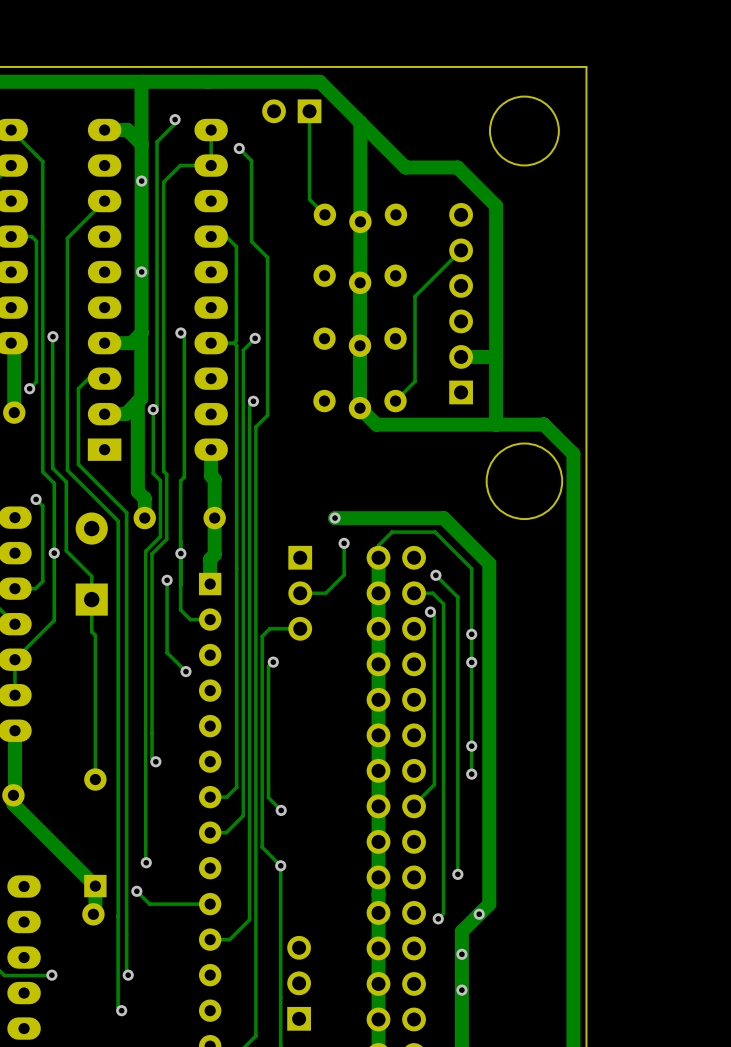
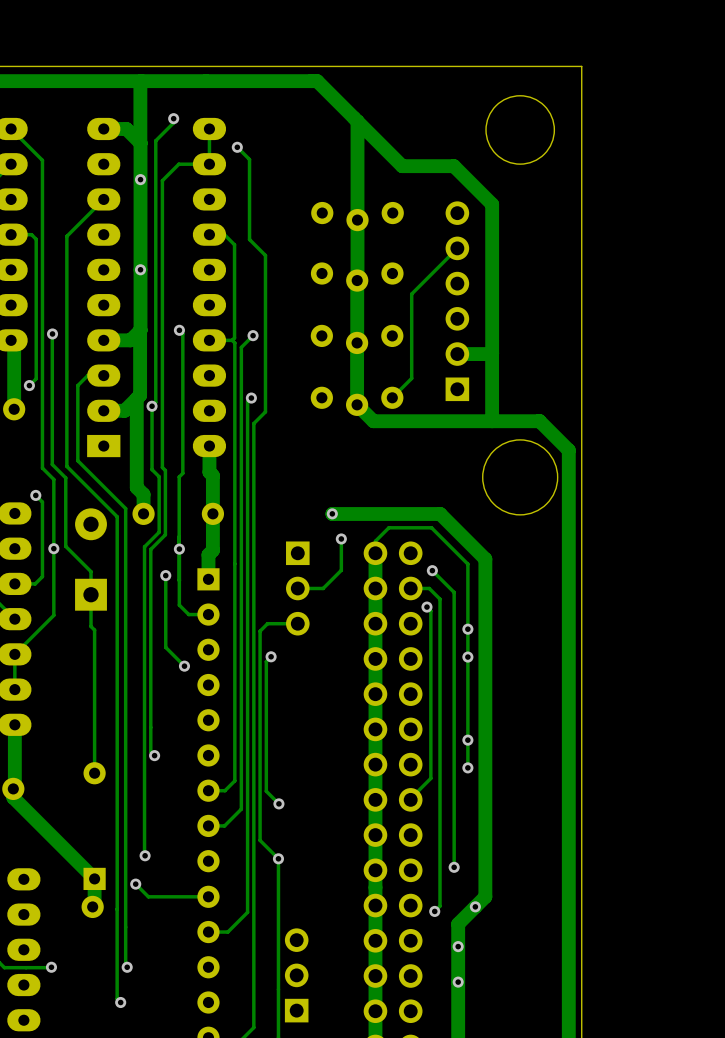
part: (291, 111) -> none
track: (309, 111) (309, 199) (324, 214) -> none

